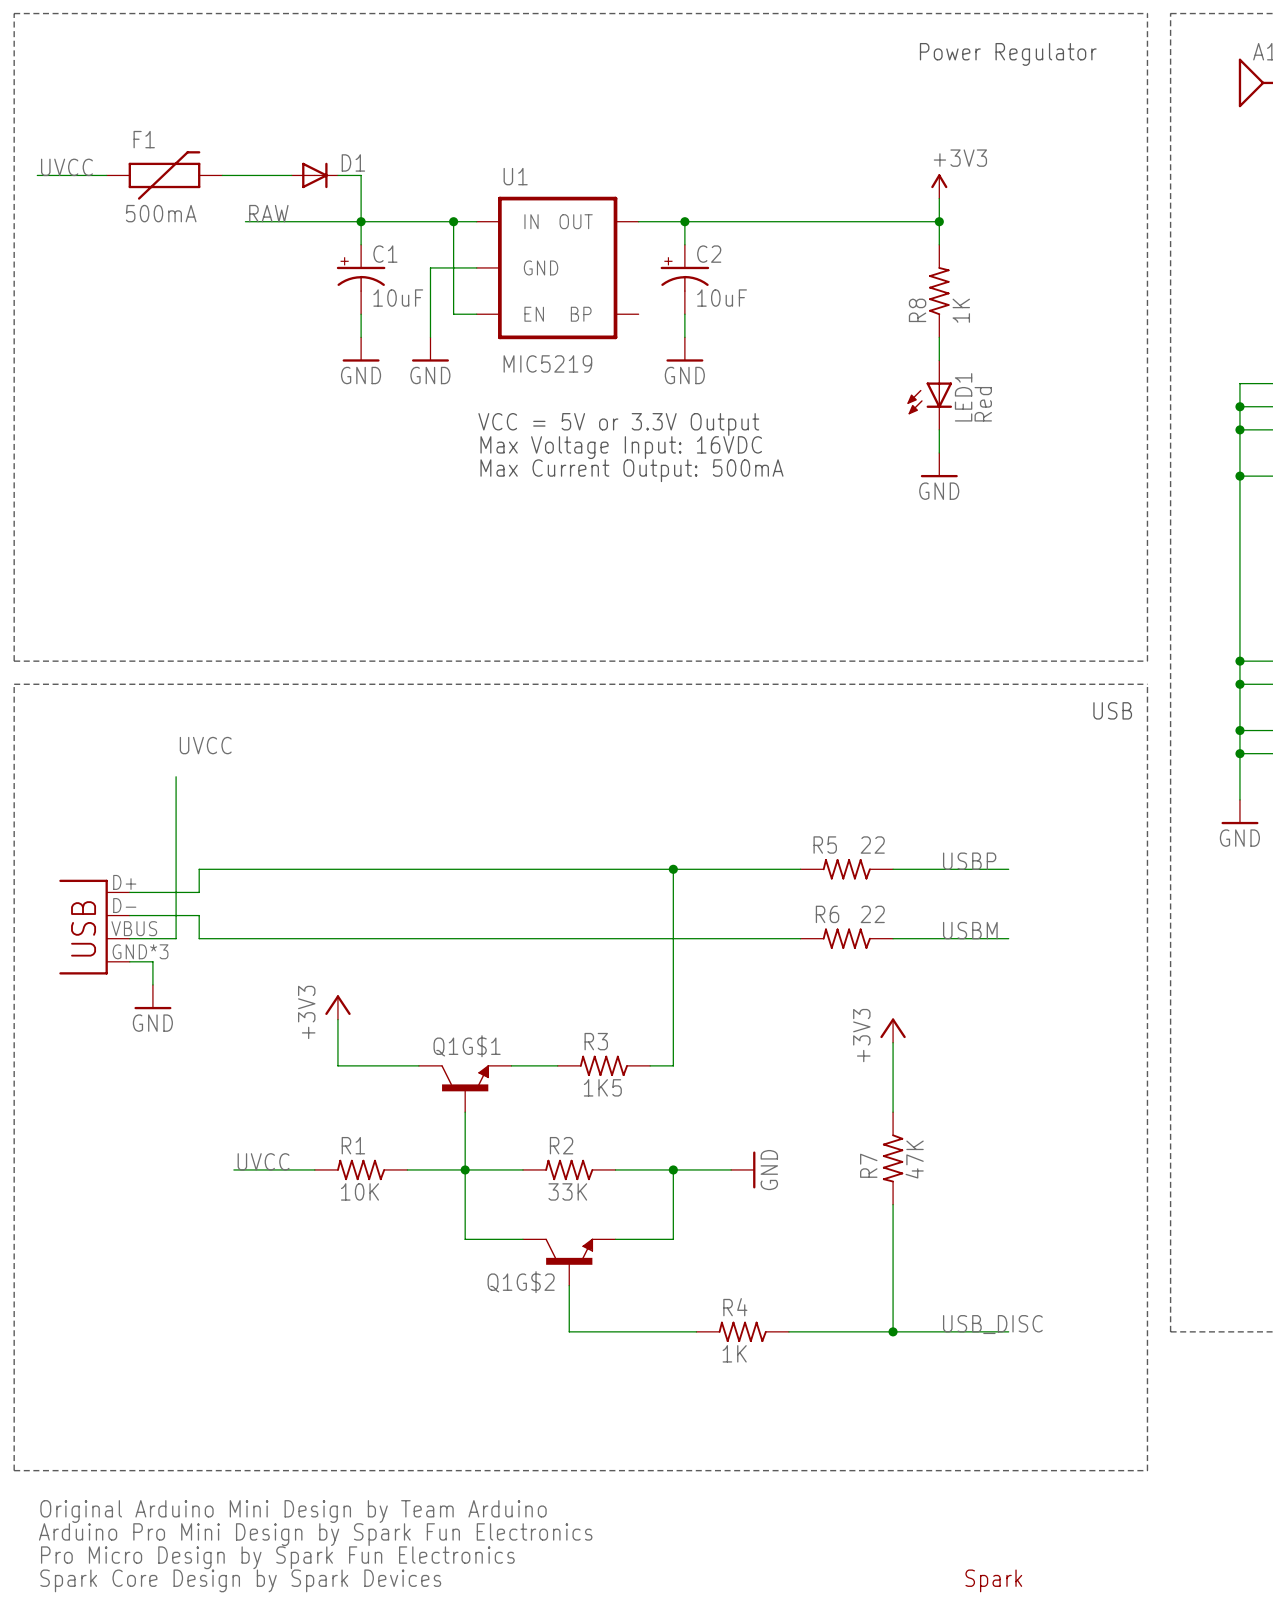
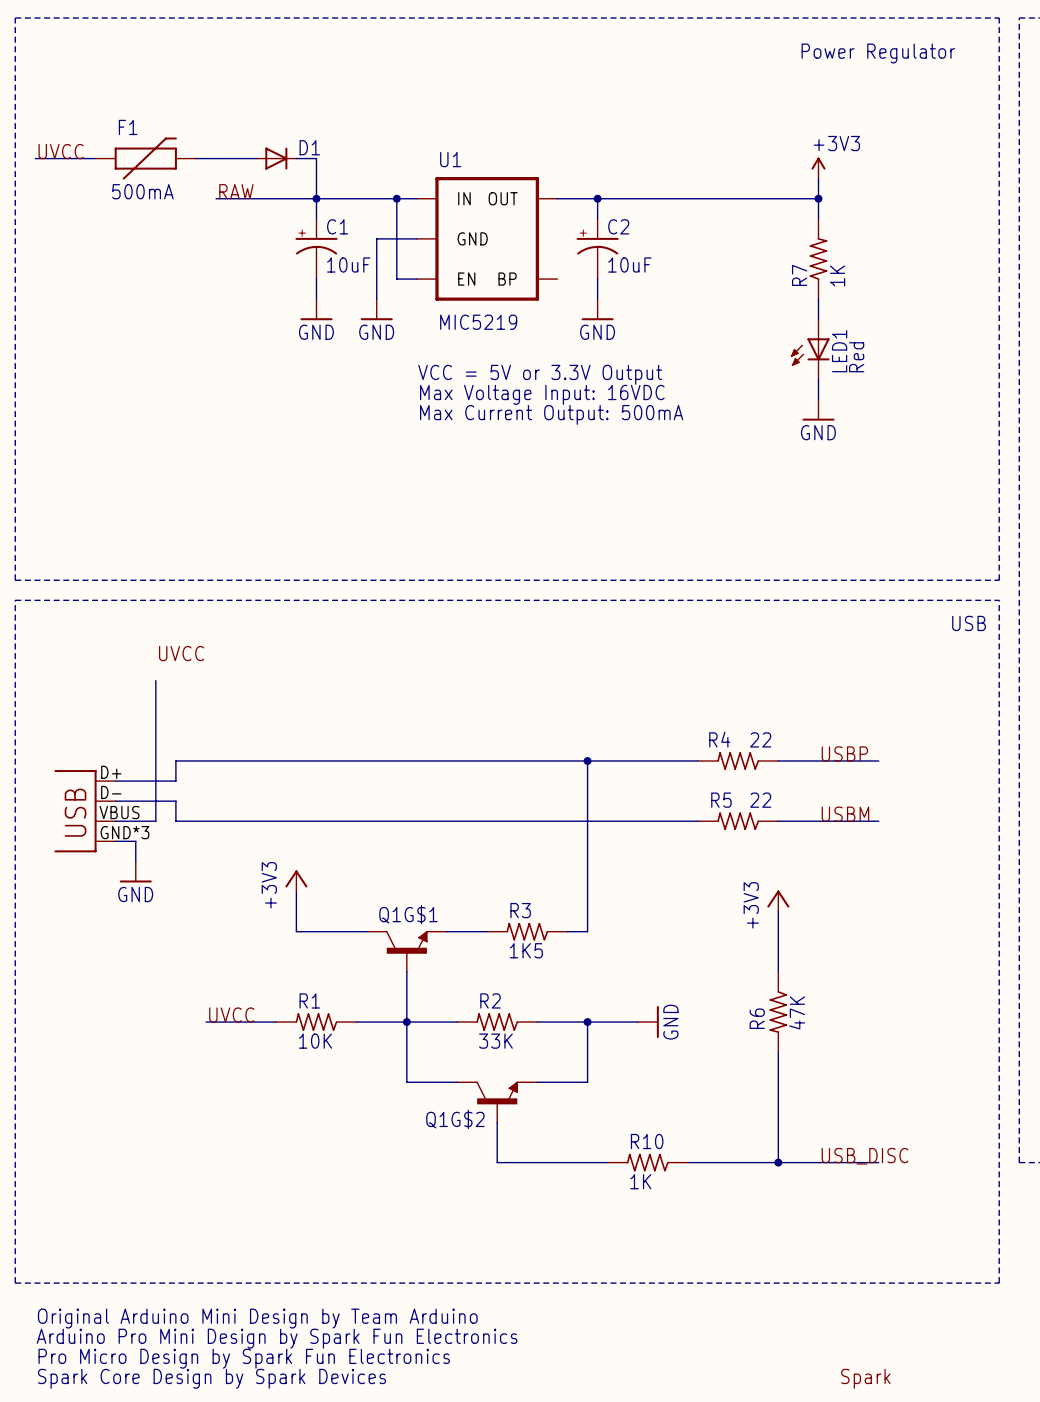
R8 name: R8 (917, 310) -> R7 (799, 275)
R5 name: R5 (825, 845) -> R4 (719, 739)
R6 name: R6 (827, 914) -> R5 (721, 800)
R7 name: R7 (868, 1165) -> R6 (757, 1018)
R4 name: R4 (735, 1307) -> R10 (647, 1141)

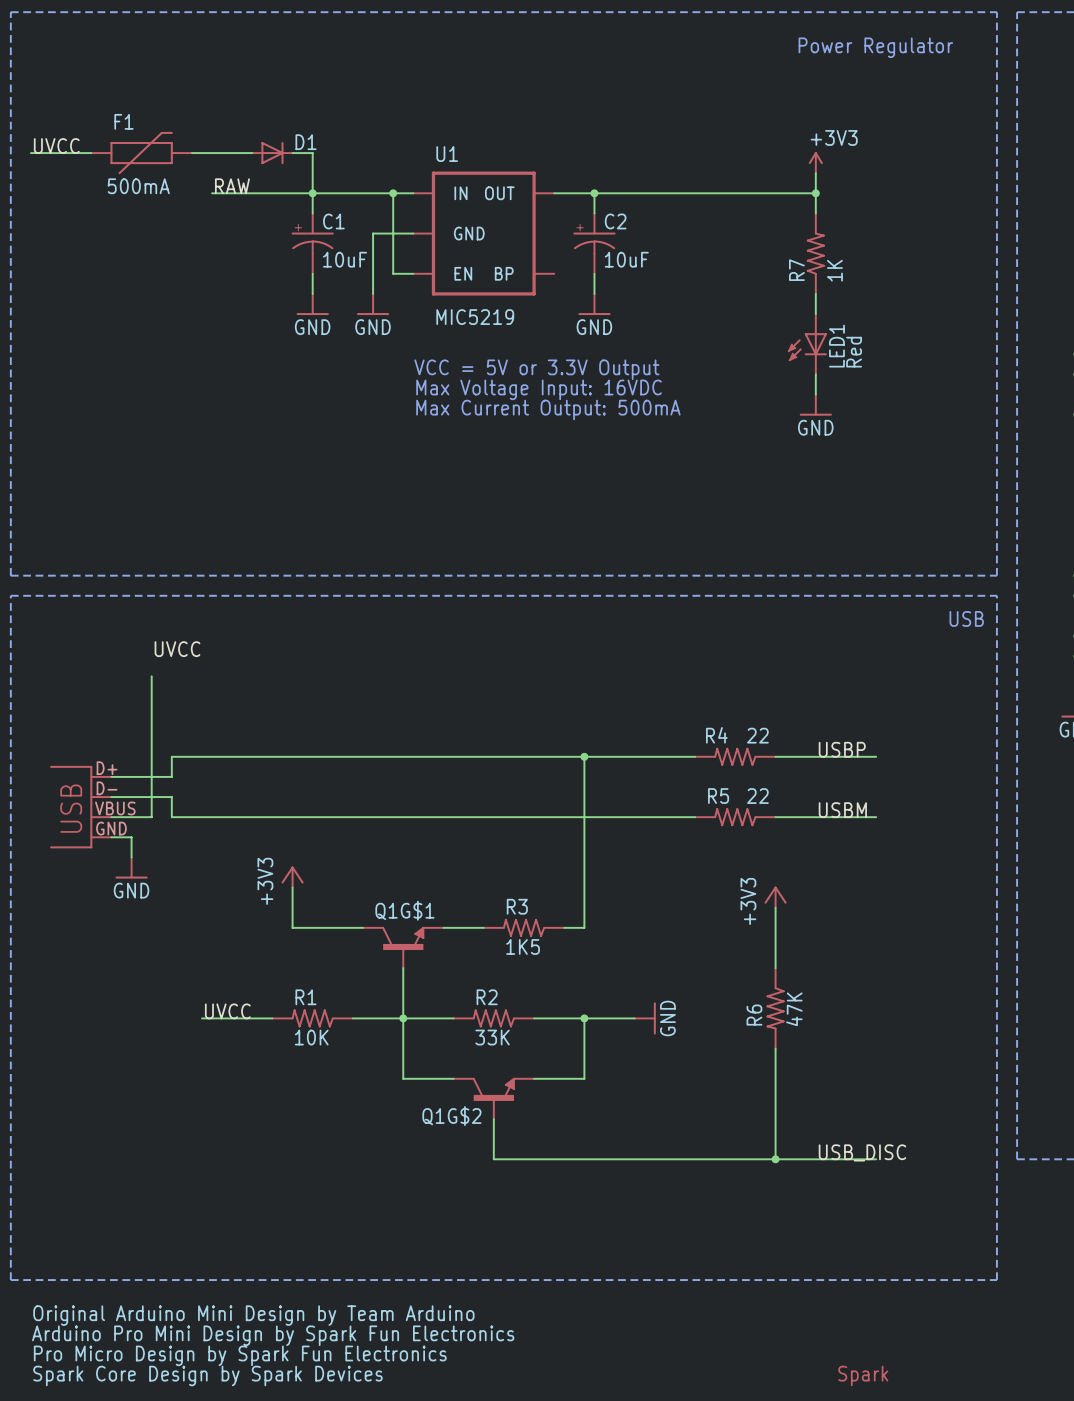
part pin number: GND*3 (124, 832) -> GND (111, 828)
R10: 1K (647, 1162) -> none

